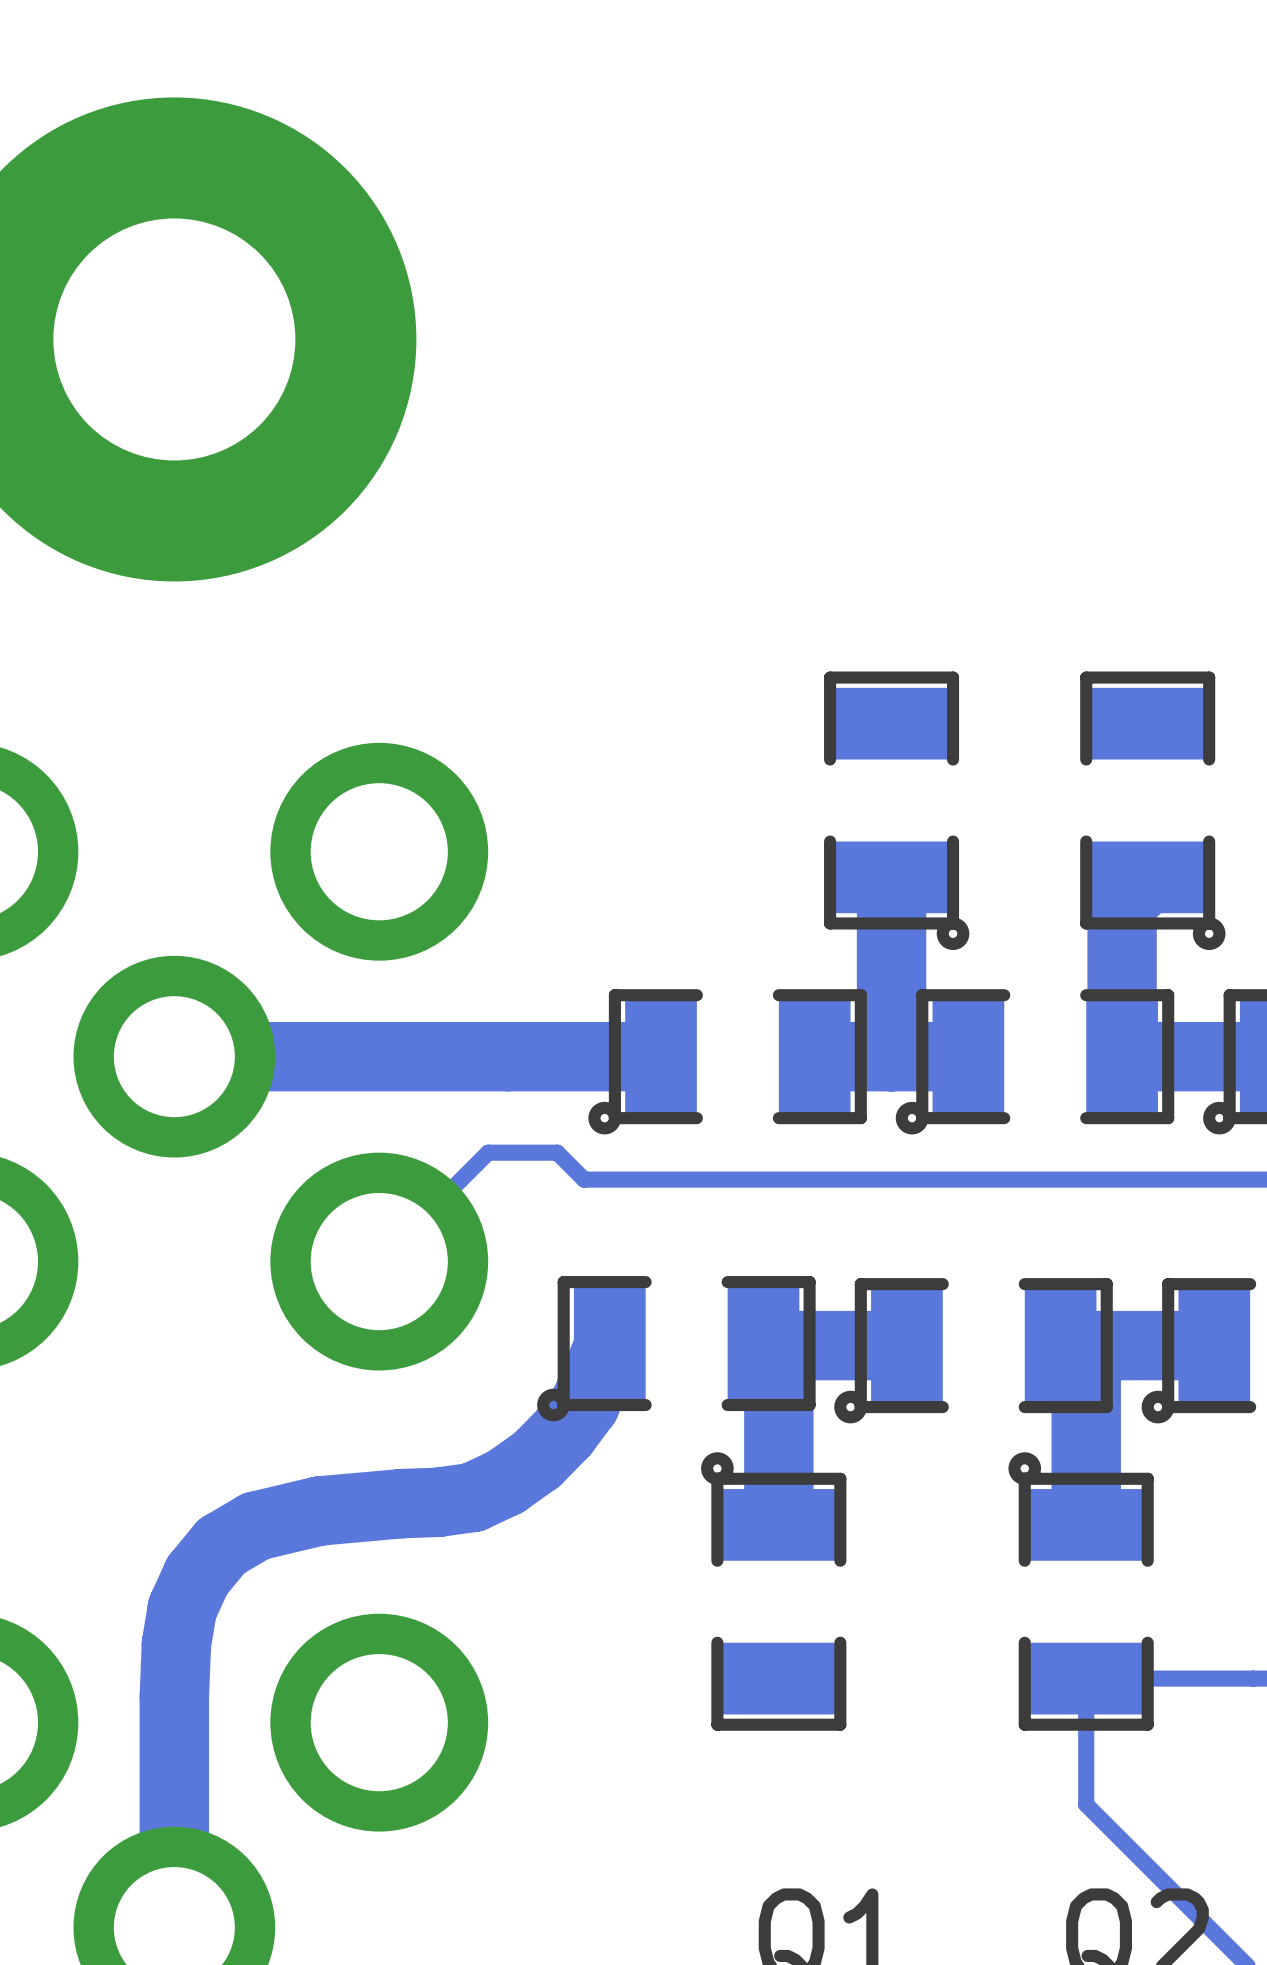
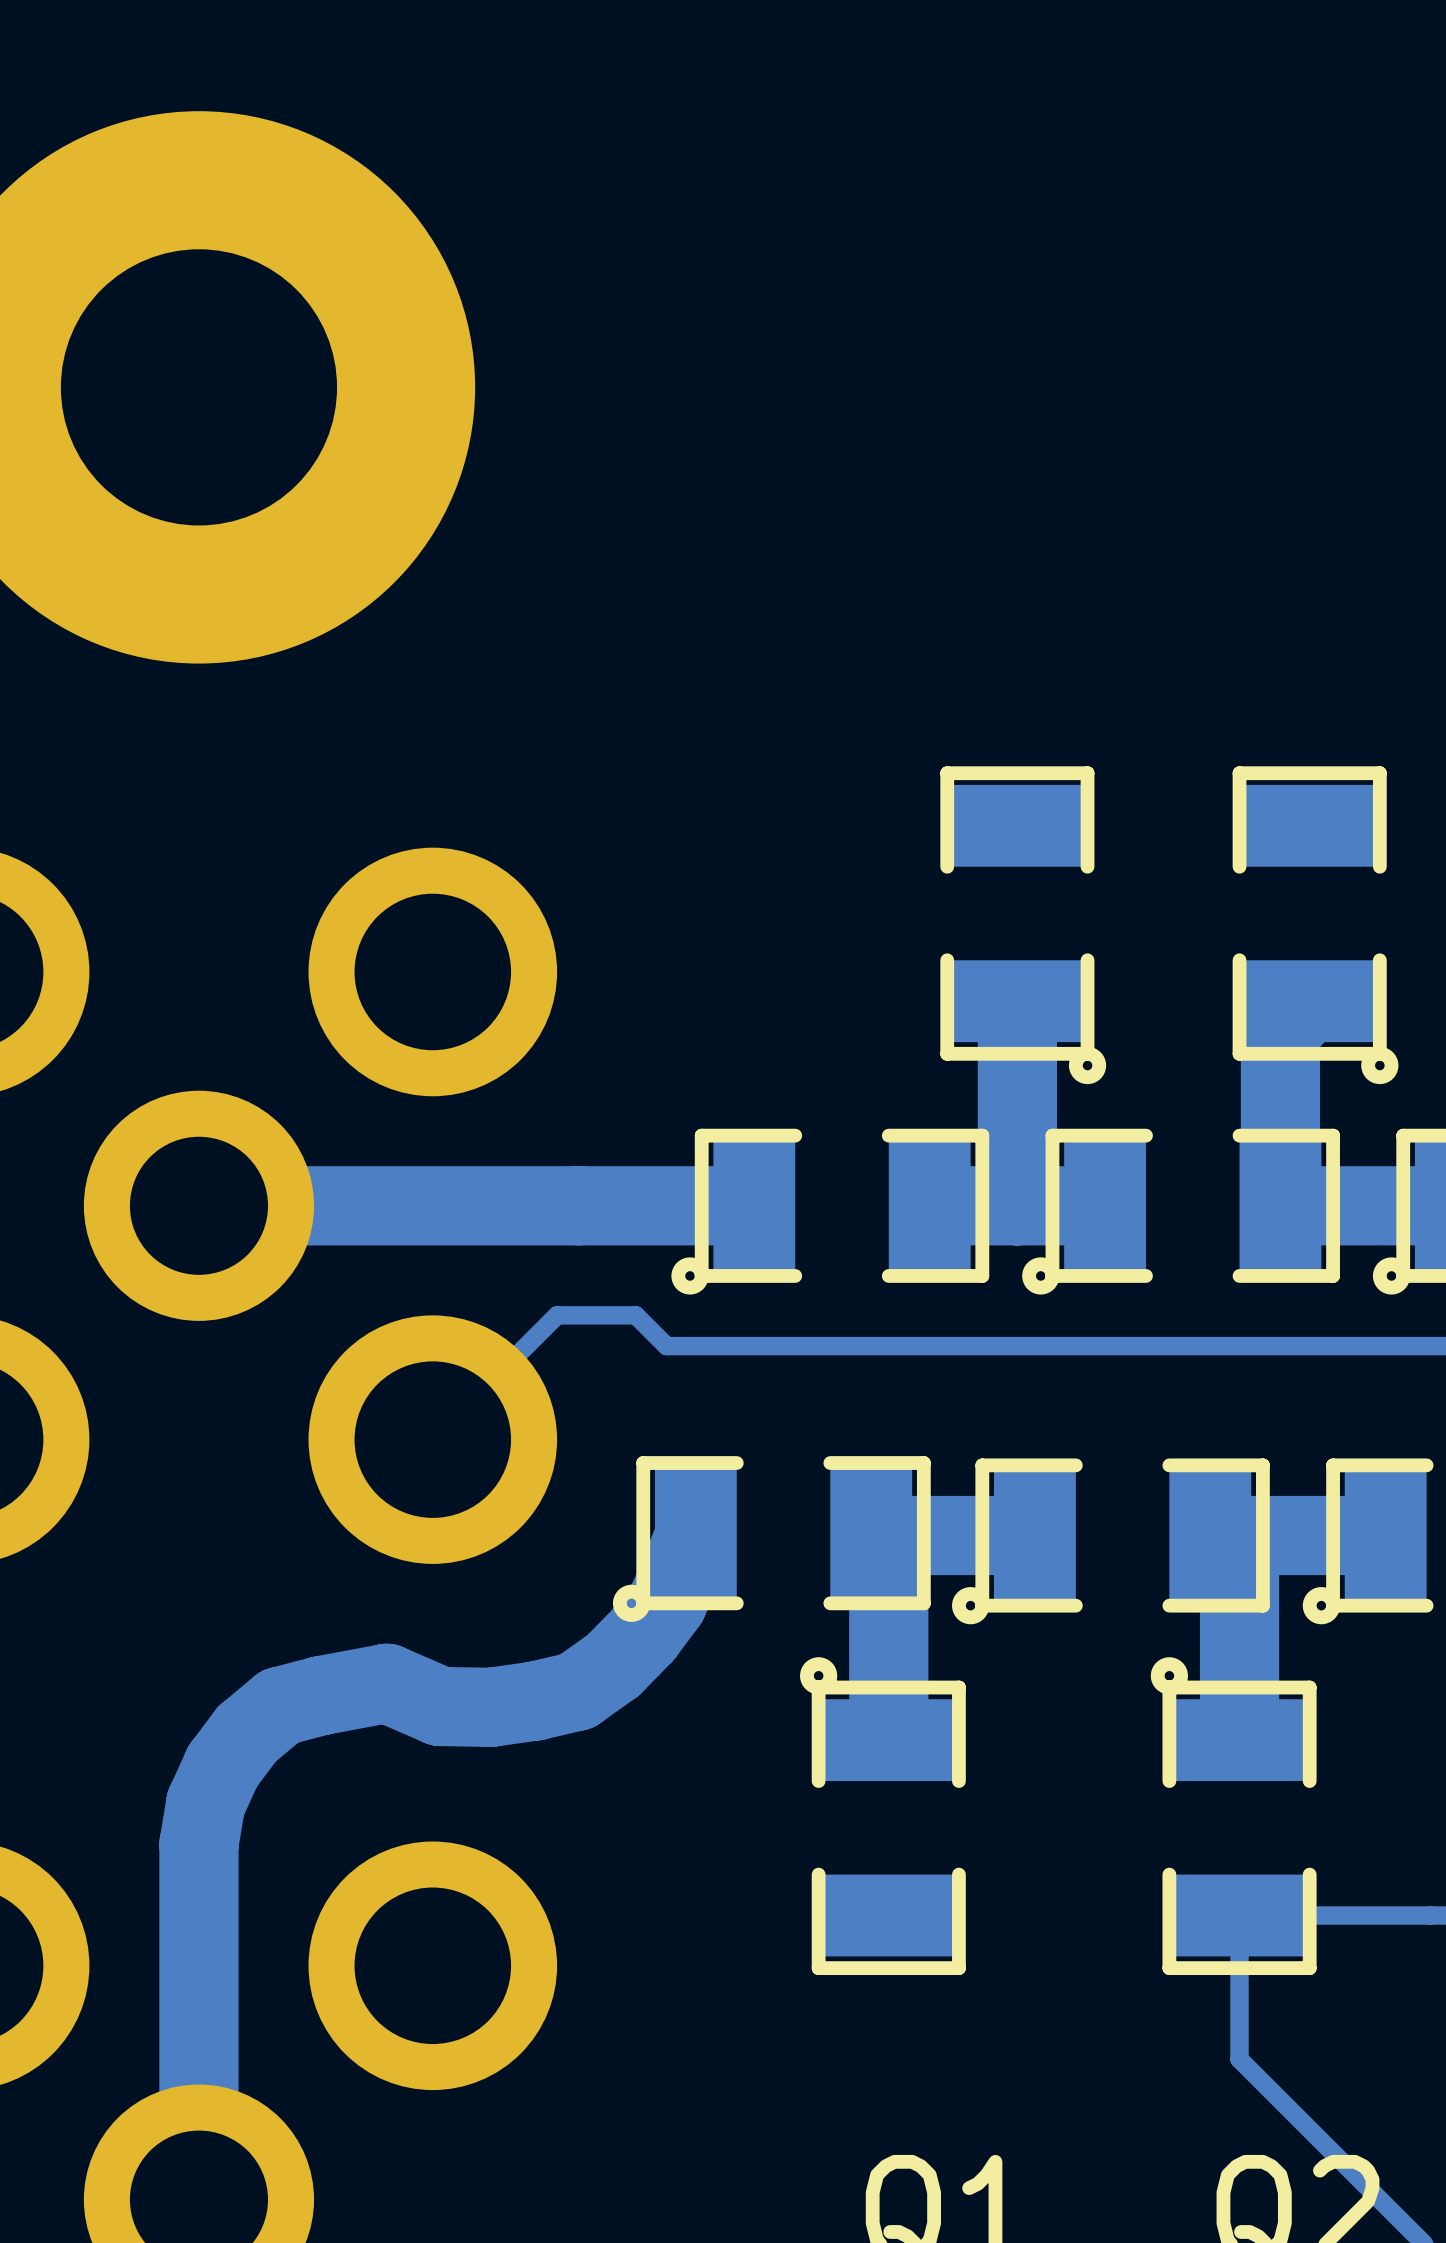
bottom track: (505, 1482) (472, 1497) (437, 1502) (319, 1510) (255, 1526) (221, 1546) (197, 1575) (182, 1608) (176, 1644) (174, 1696) -> (576, 1691) (534, 1701) (490, 1707) (440, 1706) (386, 1683) (320, 1695) (279, 1706) (246, 1734) (222, 1766) (205, 1803) (198, 1844) (198, 1935)

